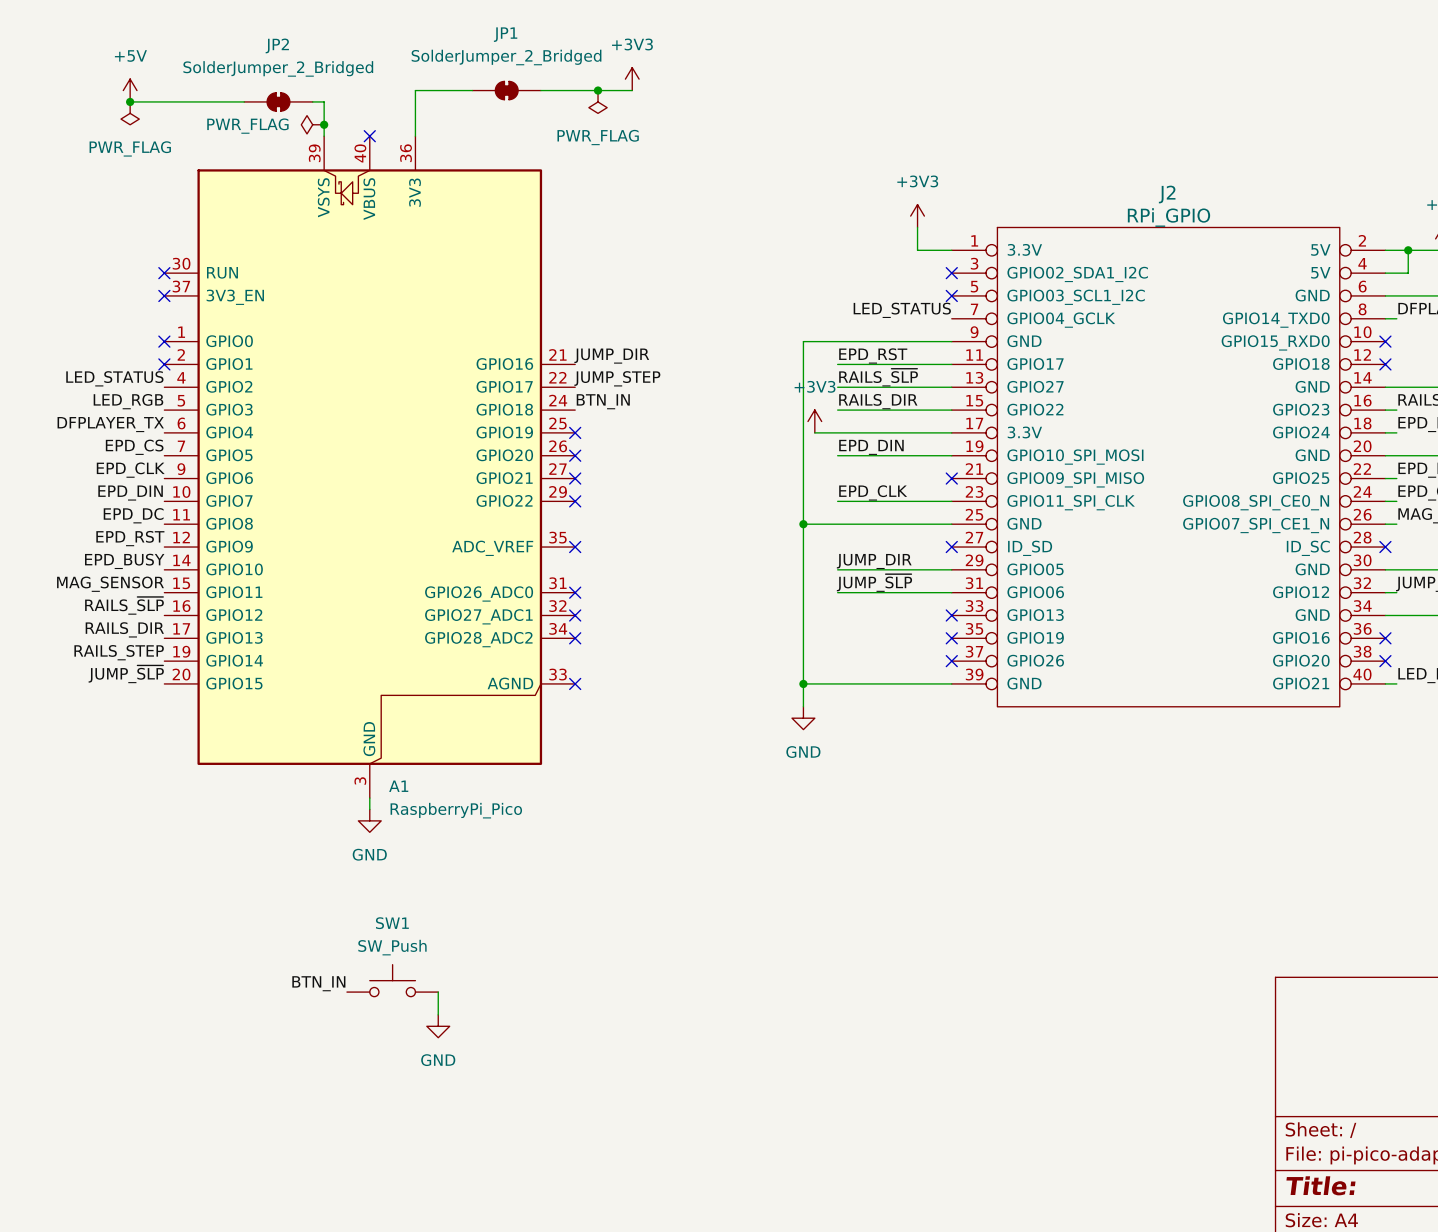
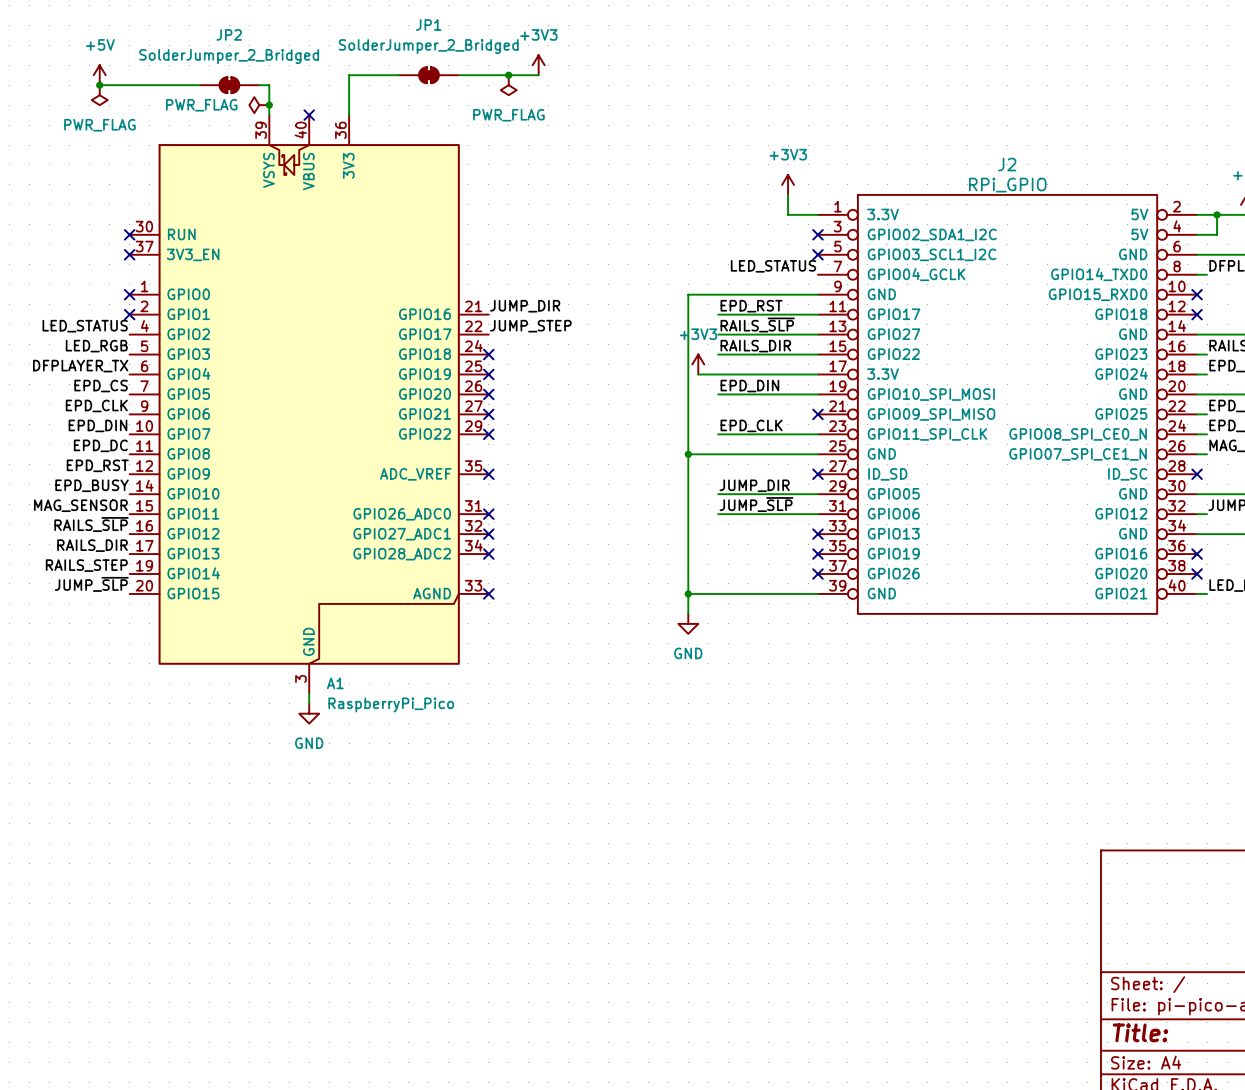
label: BTN_IN (603, 401) -> none
no-connect mark: none -> (488, 354)
SW1: SW_Push (392, 980) -> none
label: BTN_IN (318, 983) -> none
wire: (438, 992) (438, 1014) -> none
power symbol: GND (438, 1026) -> none

